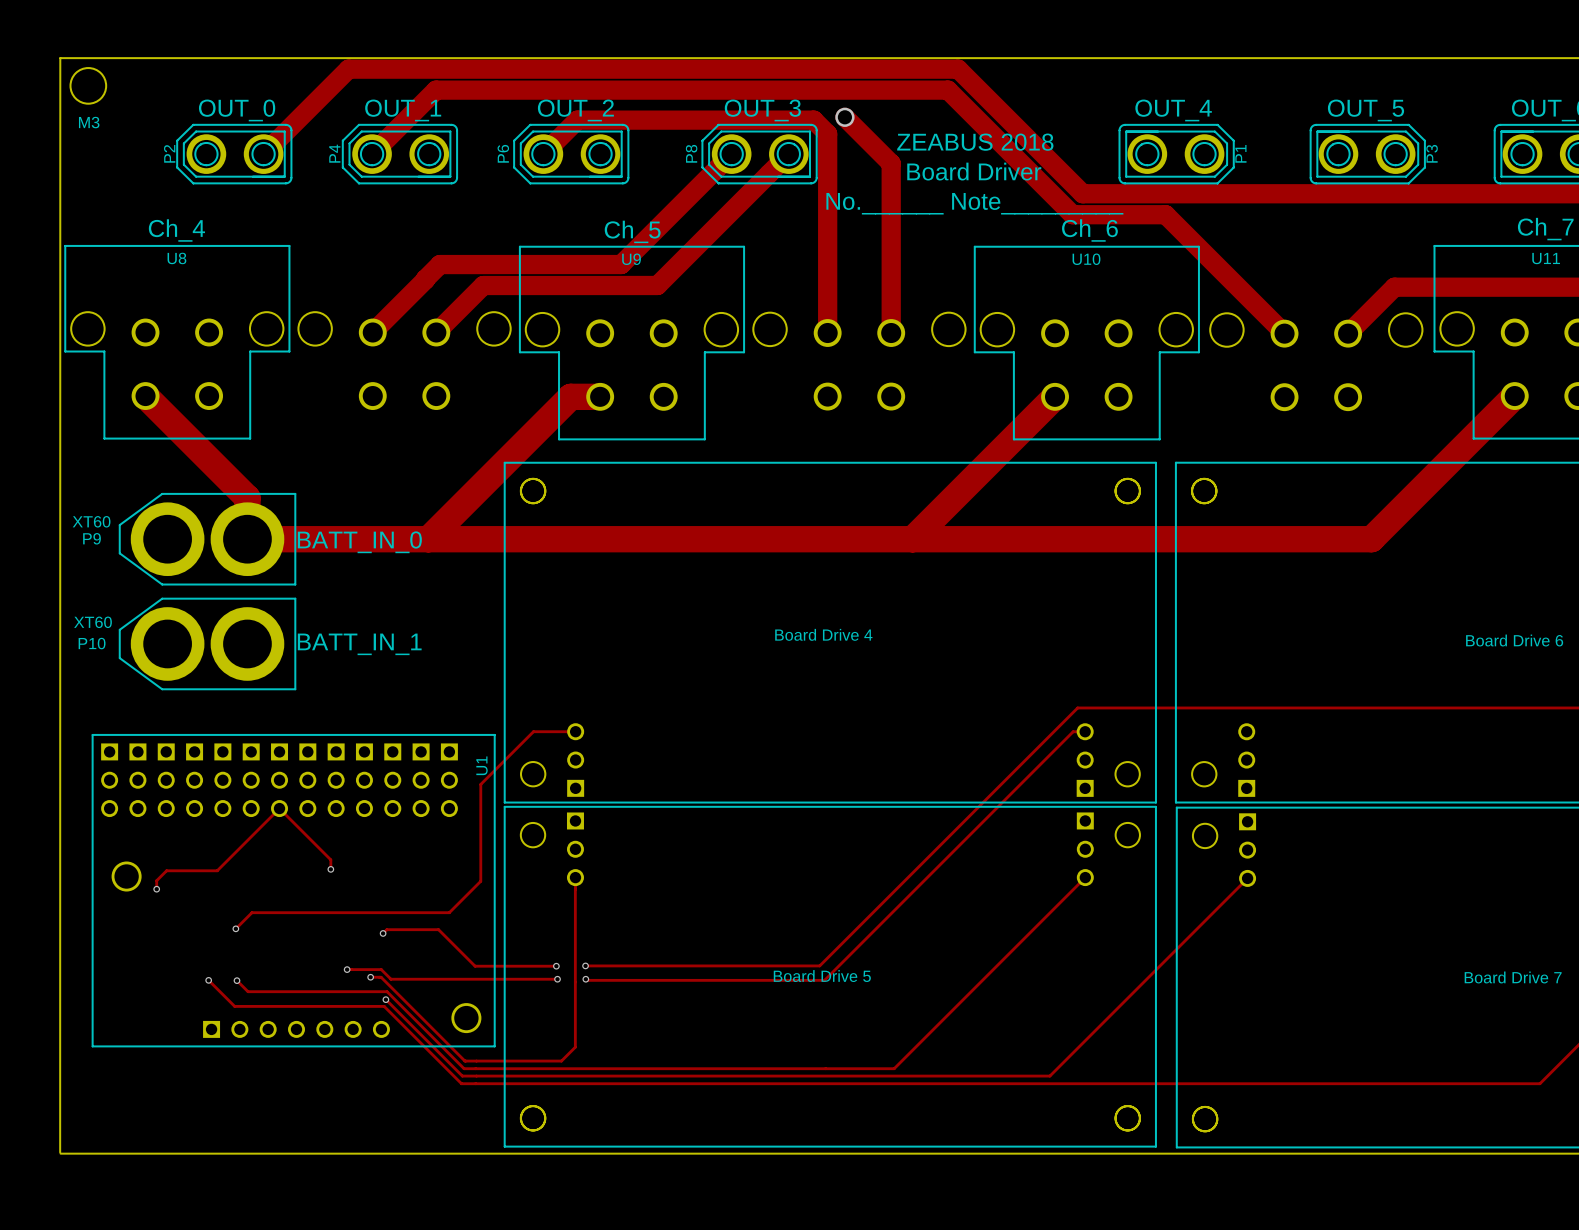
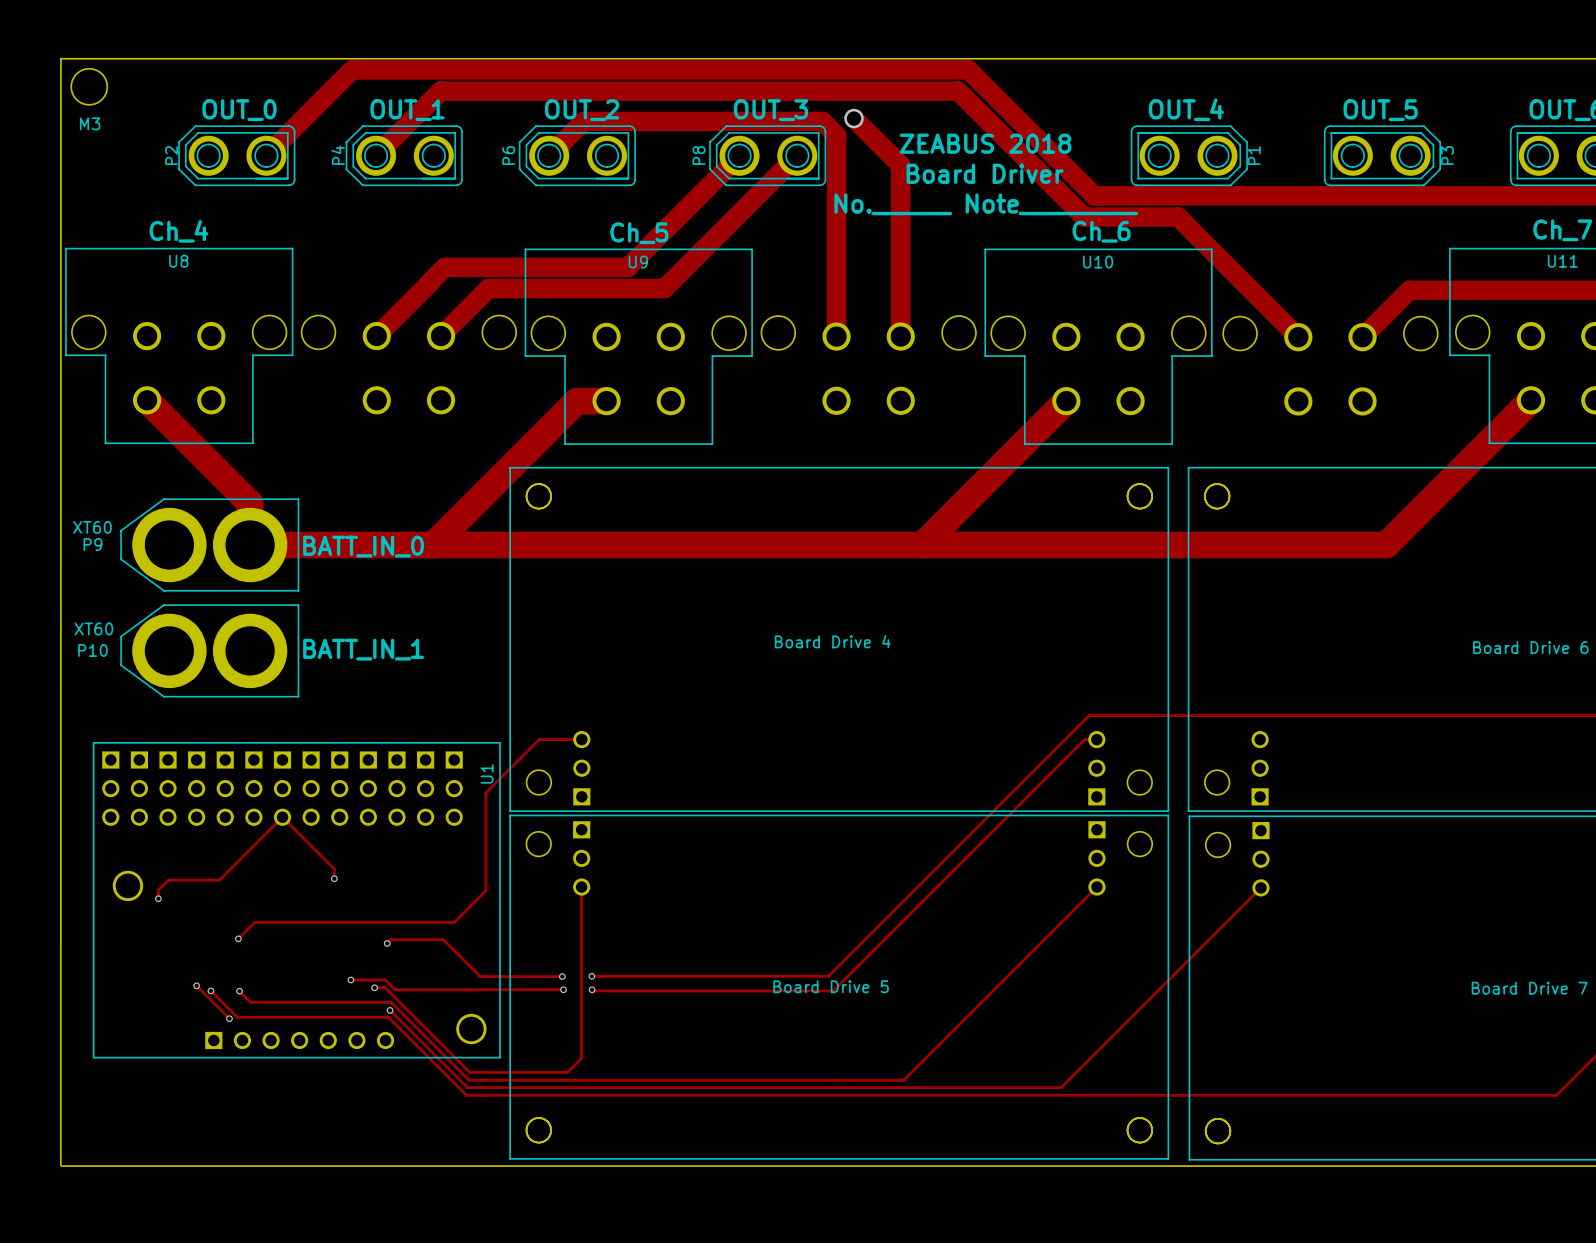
track: none -> (196, 985) (229, 1018)
via: none -> (196, 985)
via: none -> (229, 1018)

